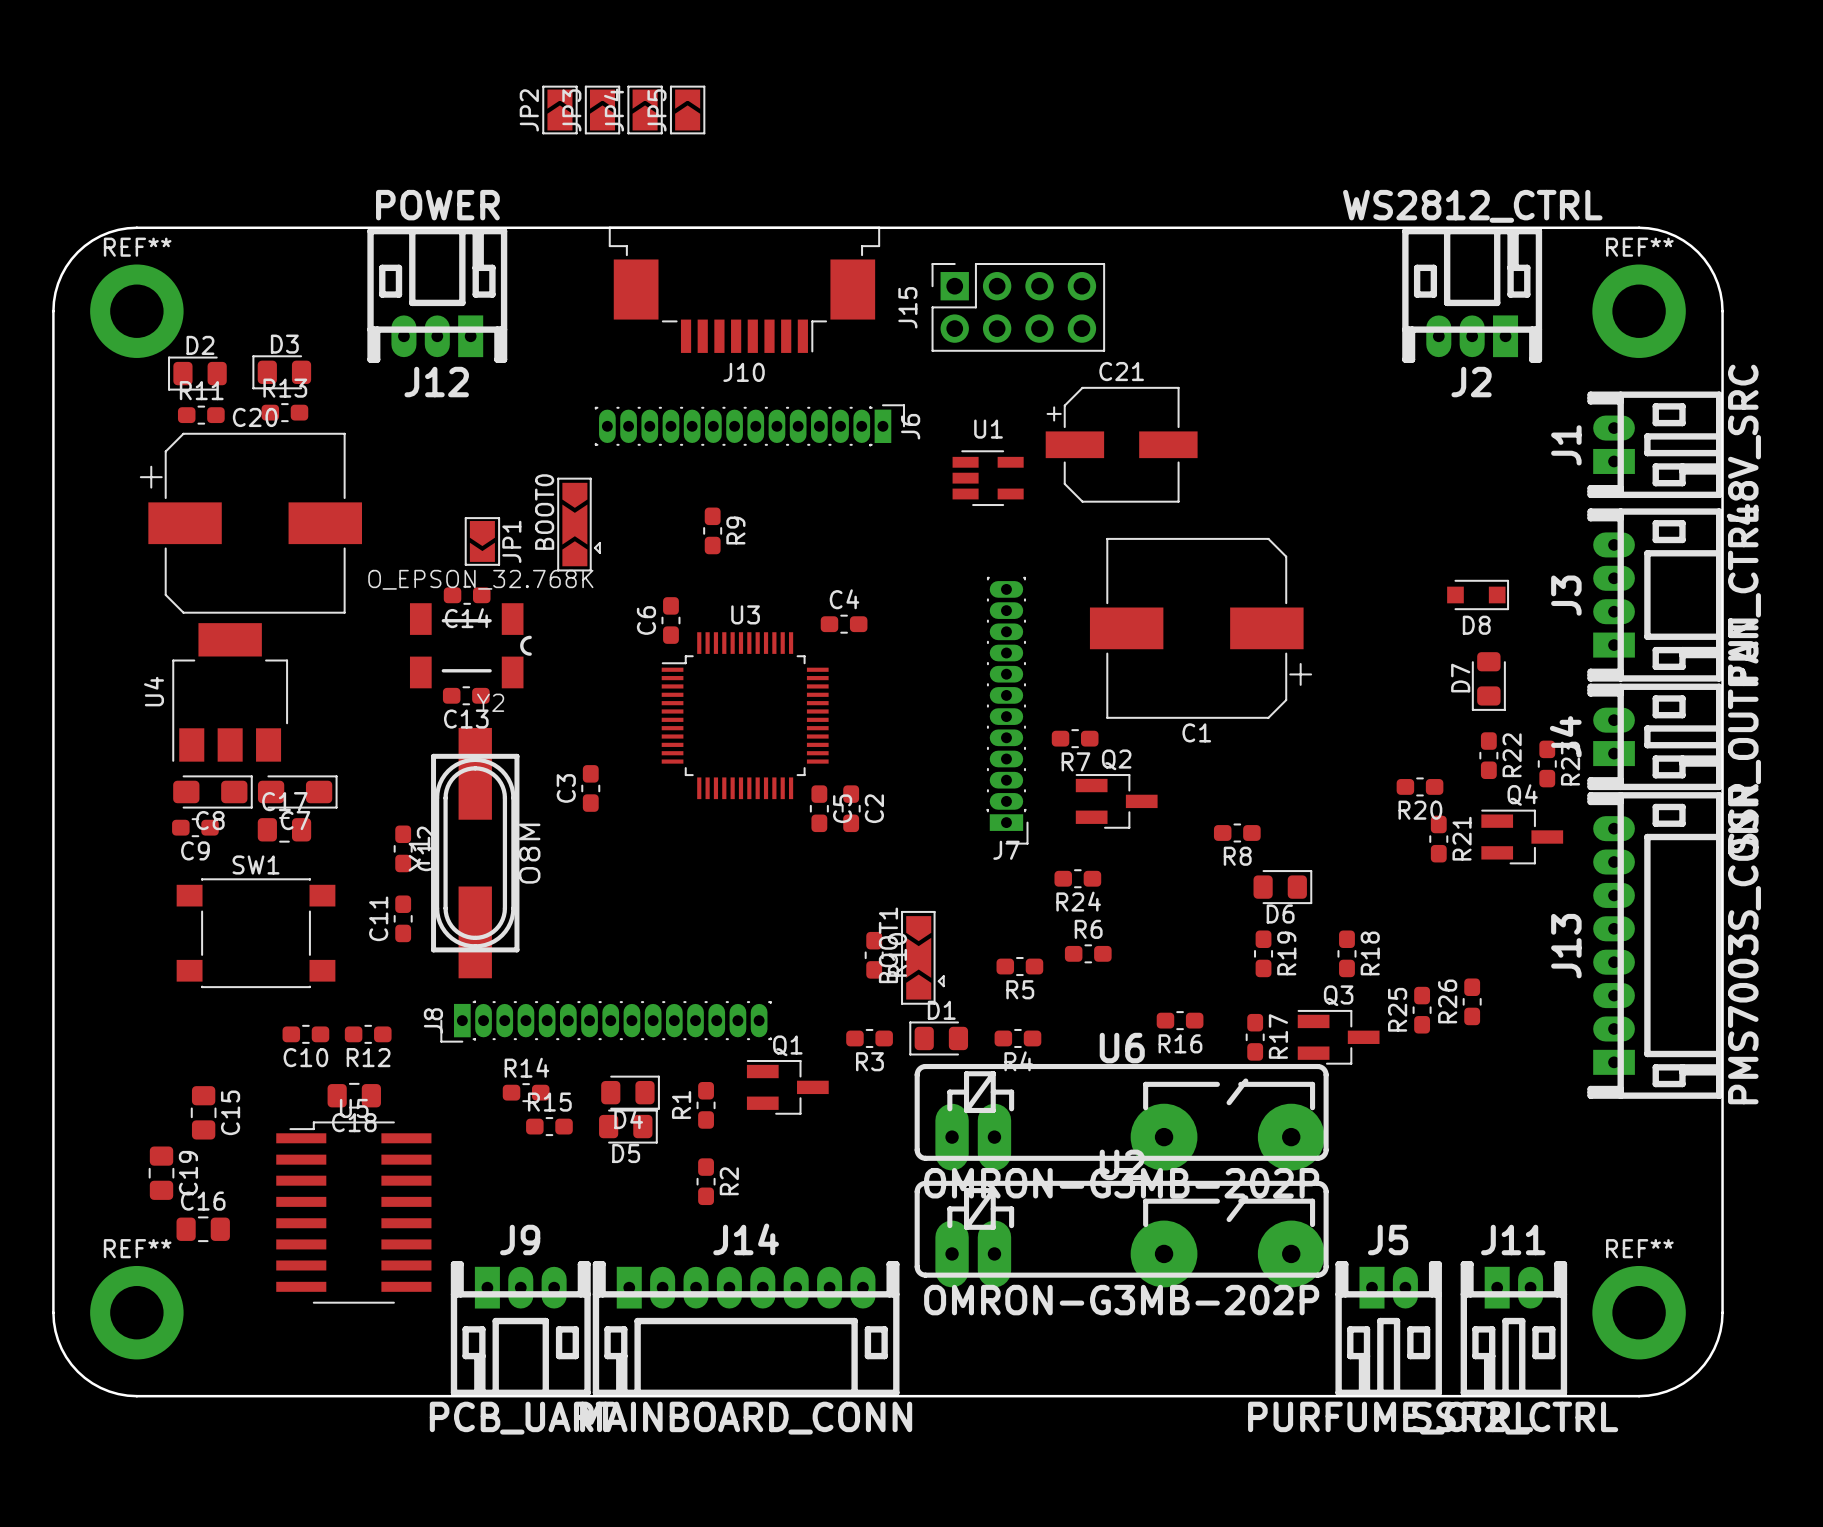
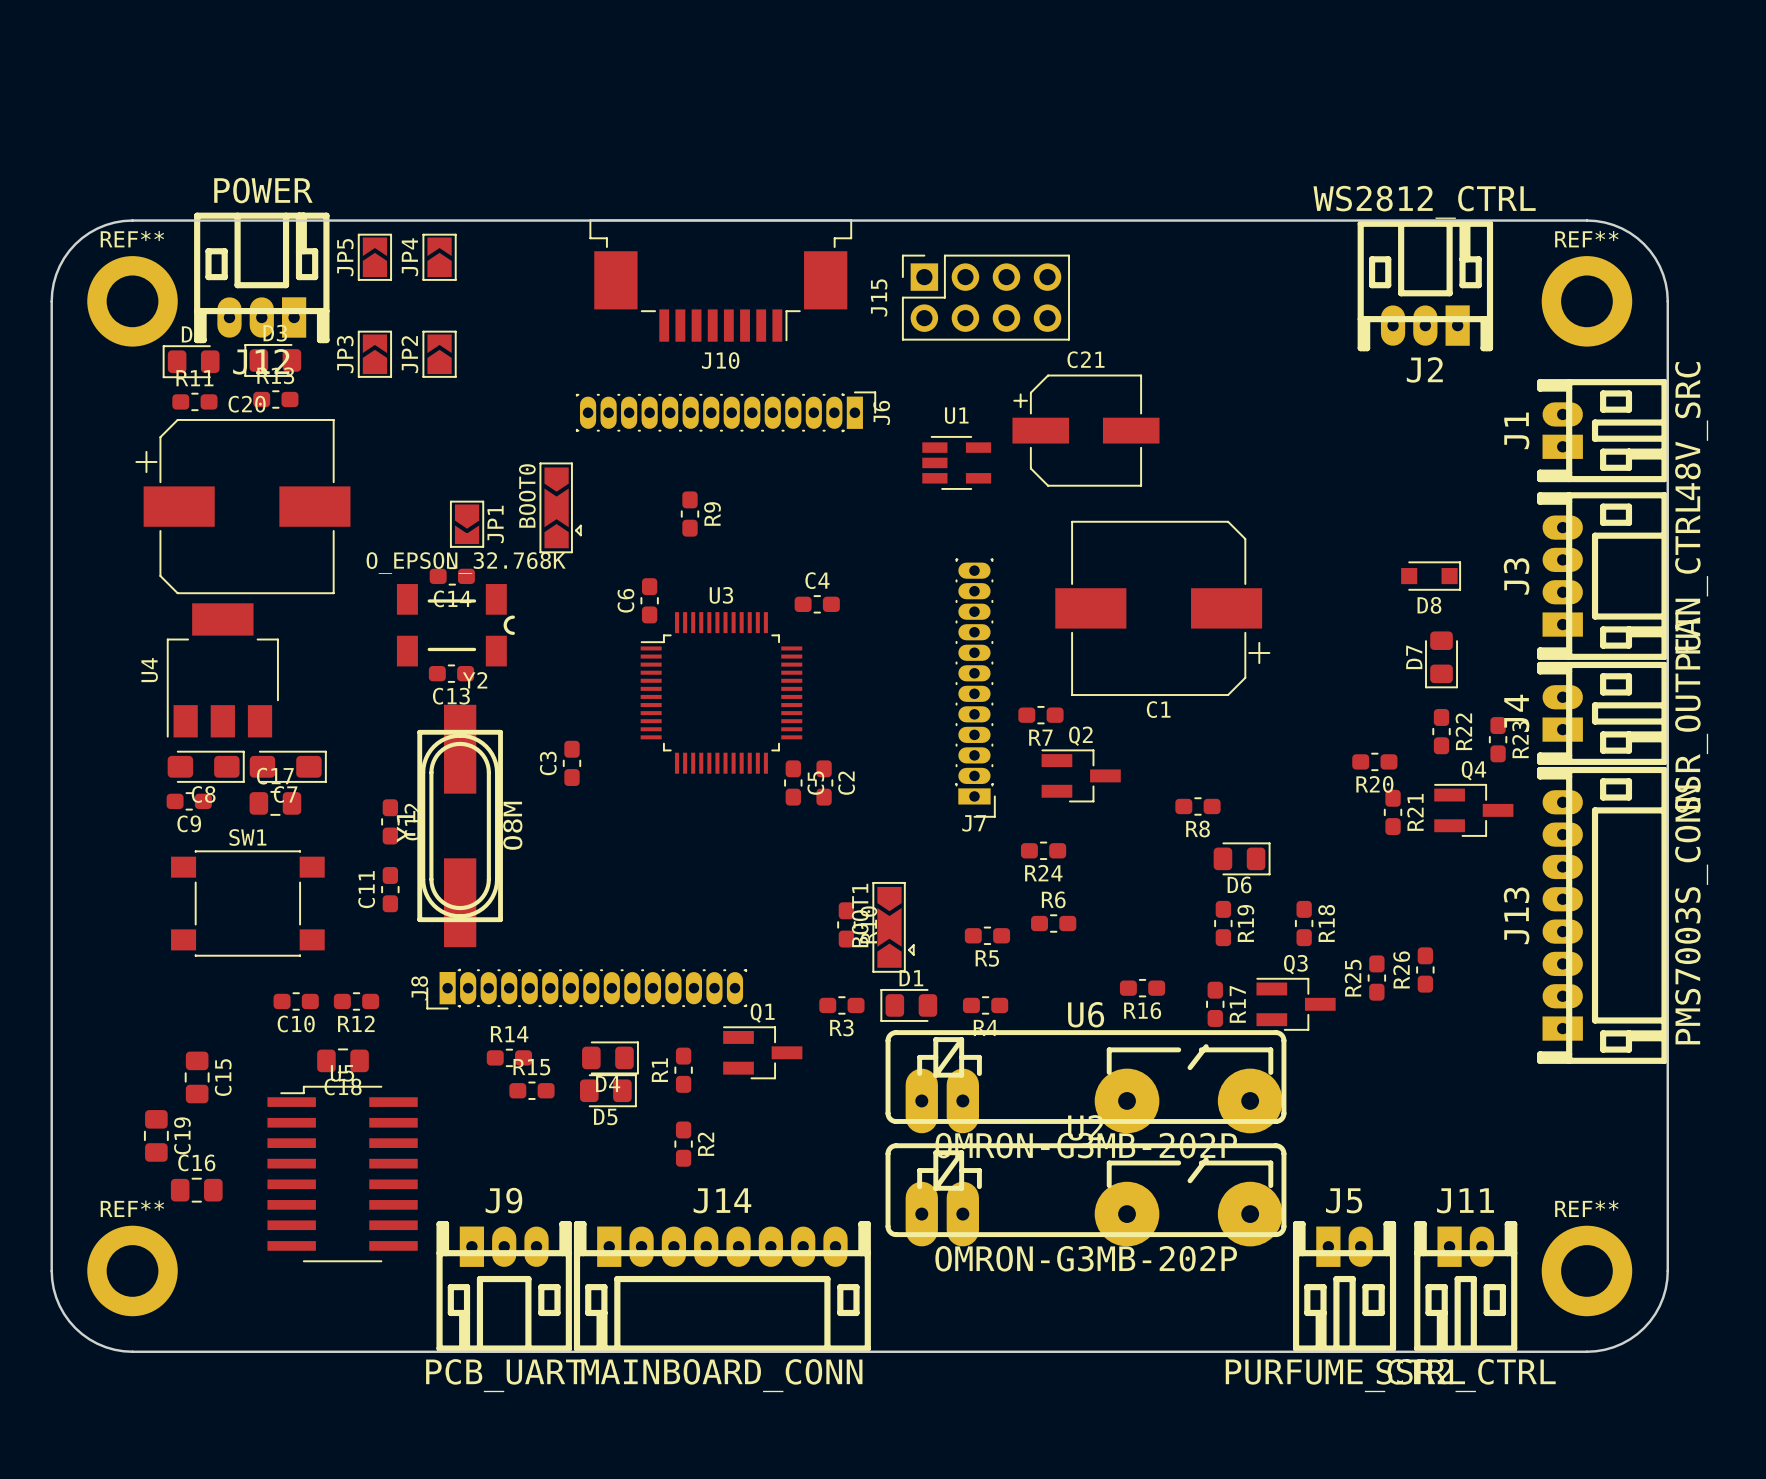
JP2 position: (559, 110) -> (439, 354)
JP3 position: (602, 110) -> (374, 354)
JP4 position: (645, 110) -> (439, 257)
JP5 position: (687, 110) -> (374, 257)
J12 position: (437, 295) -> (261, 277)

